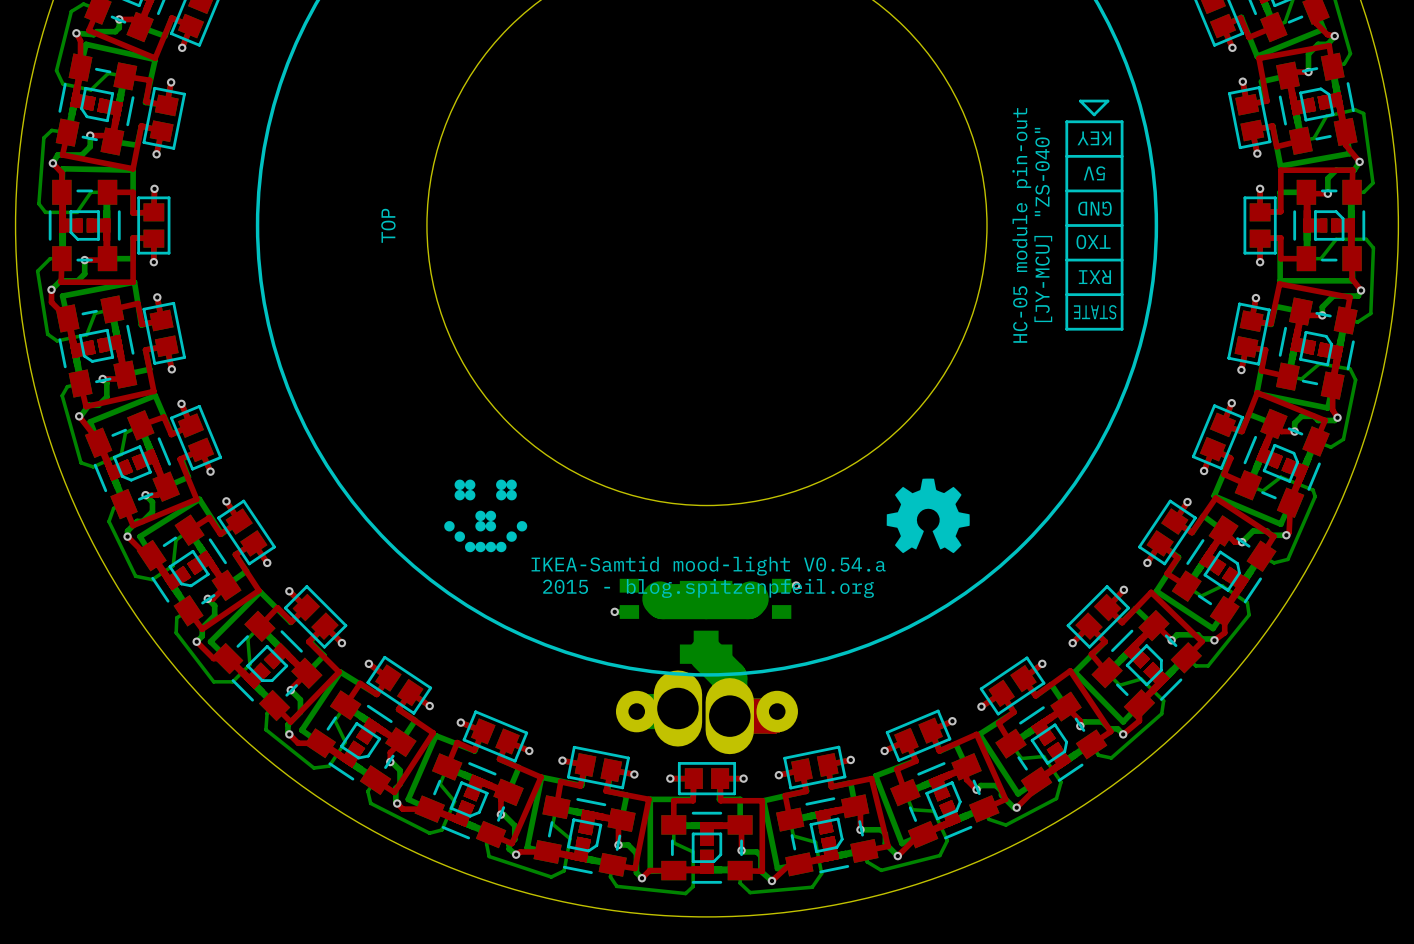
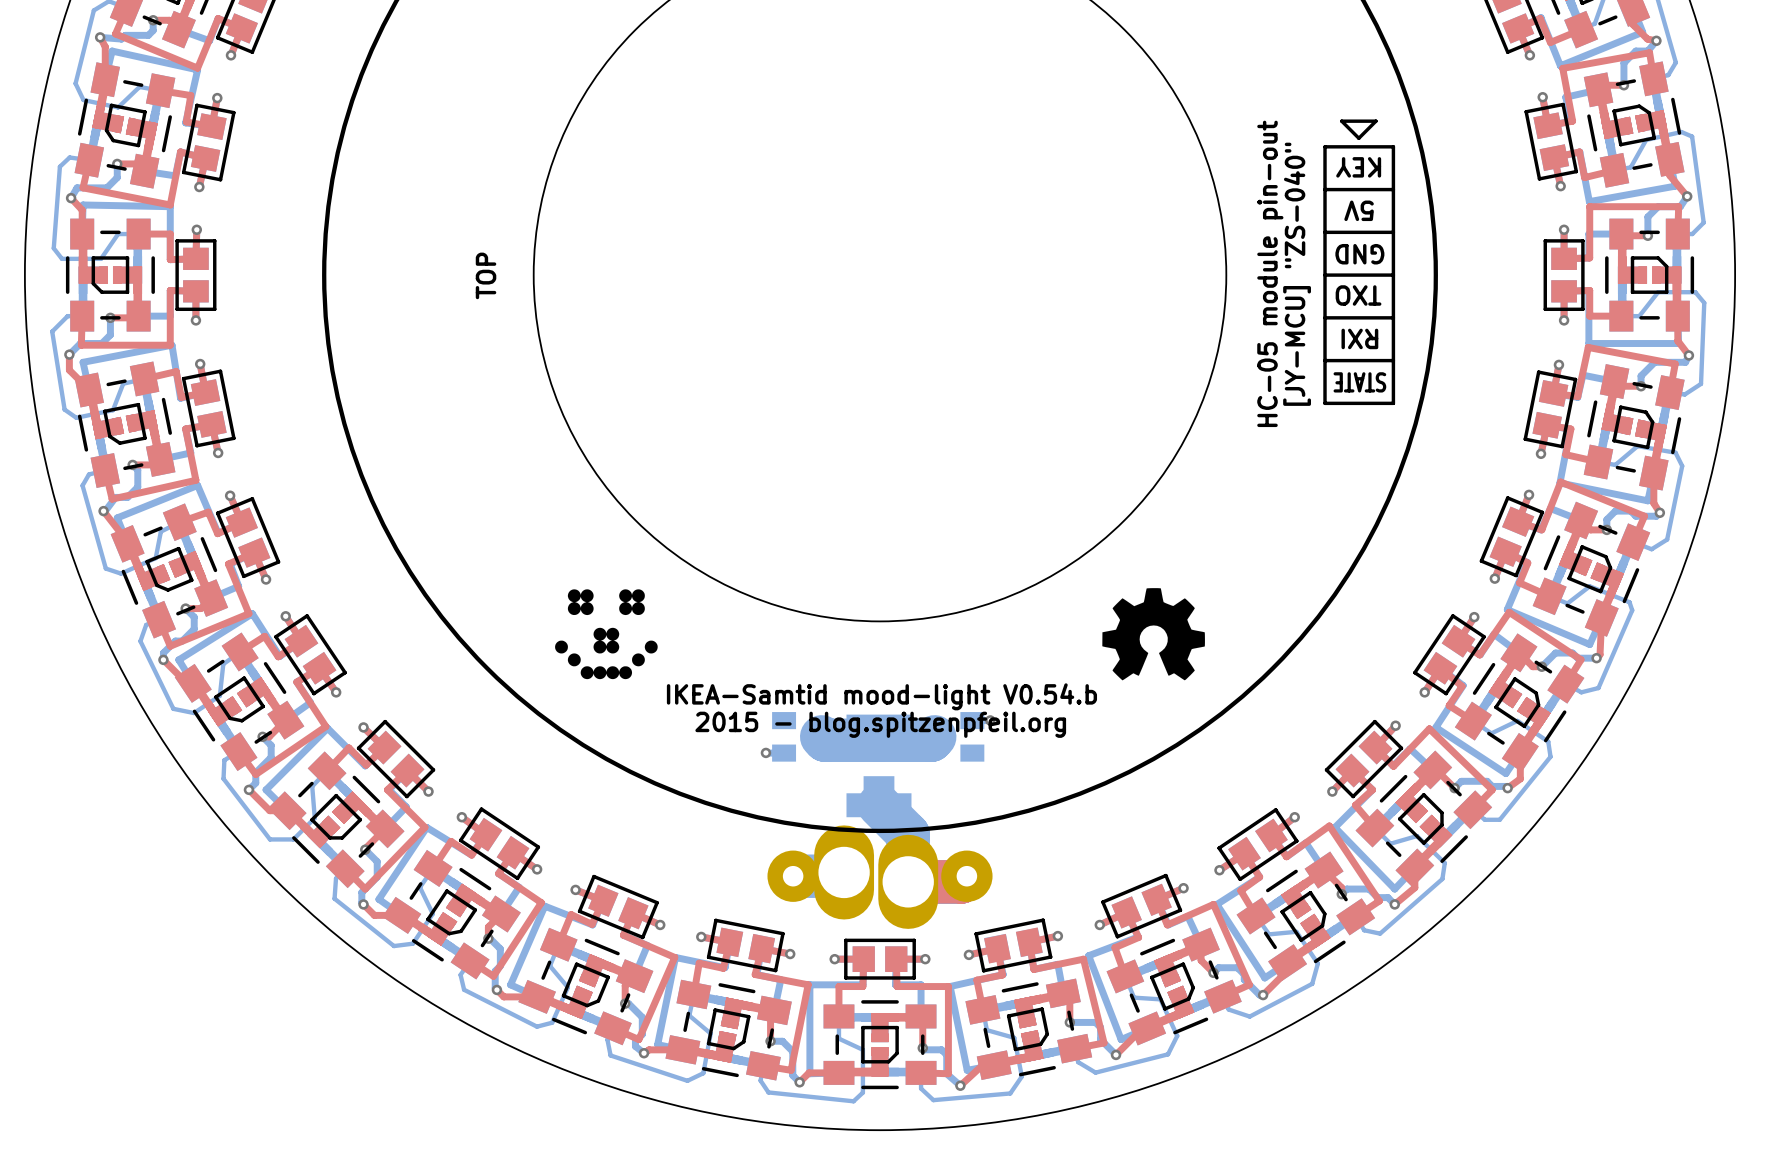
text: IKEA-Samtid mood-light V0.54.a (708, 566) -> IKEA-Samtid mood-light V0.54.b (881, 696)

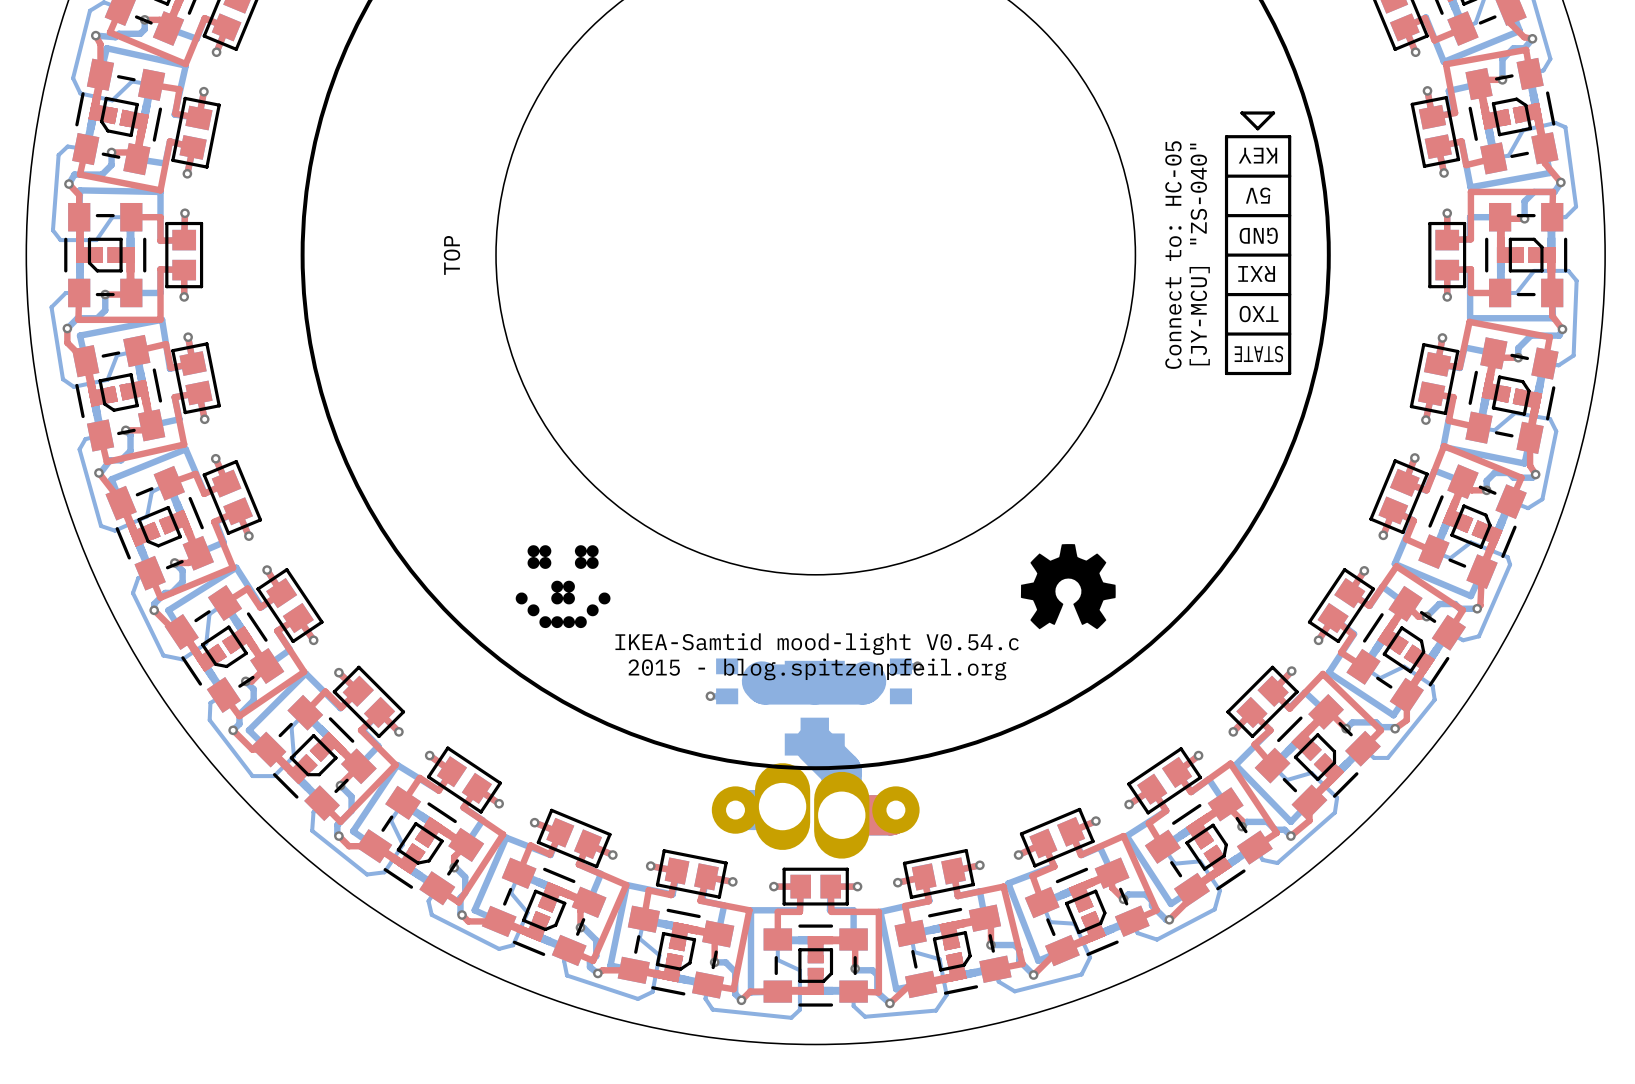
text: HC-05 module pin-out (1270, 273) -> Connect to: HC-05 (1173, 255)
text: TXO (1358, 295) -> RXI (1256, 273)
text: RXI (1359, 338) -> TXO (1259, 314)
text: IKEA-Samtid mood-light V0.54.b (881, 696) -> IKEA-Samtid mood-light V0.54.c (817, 644)

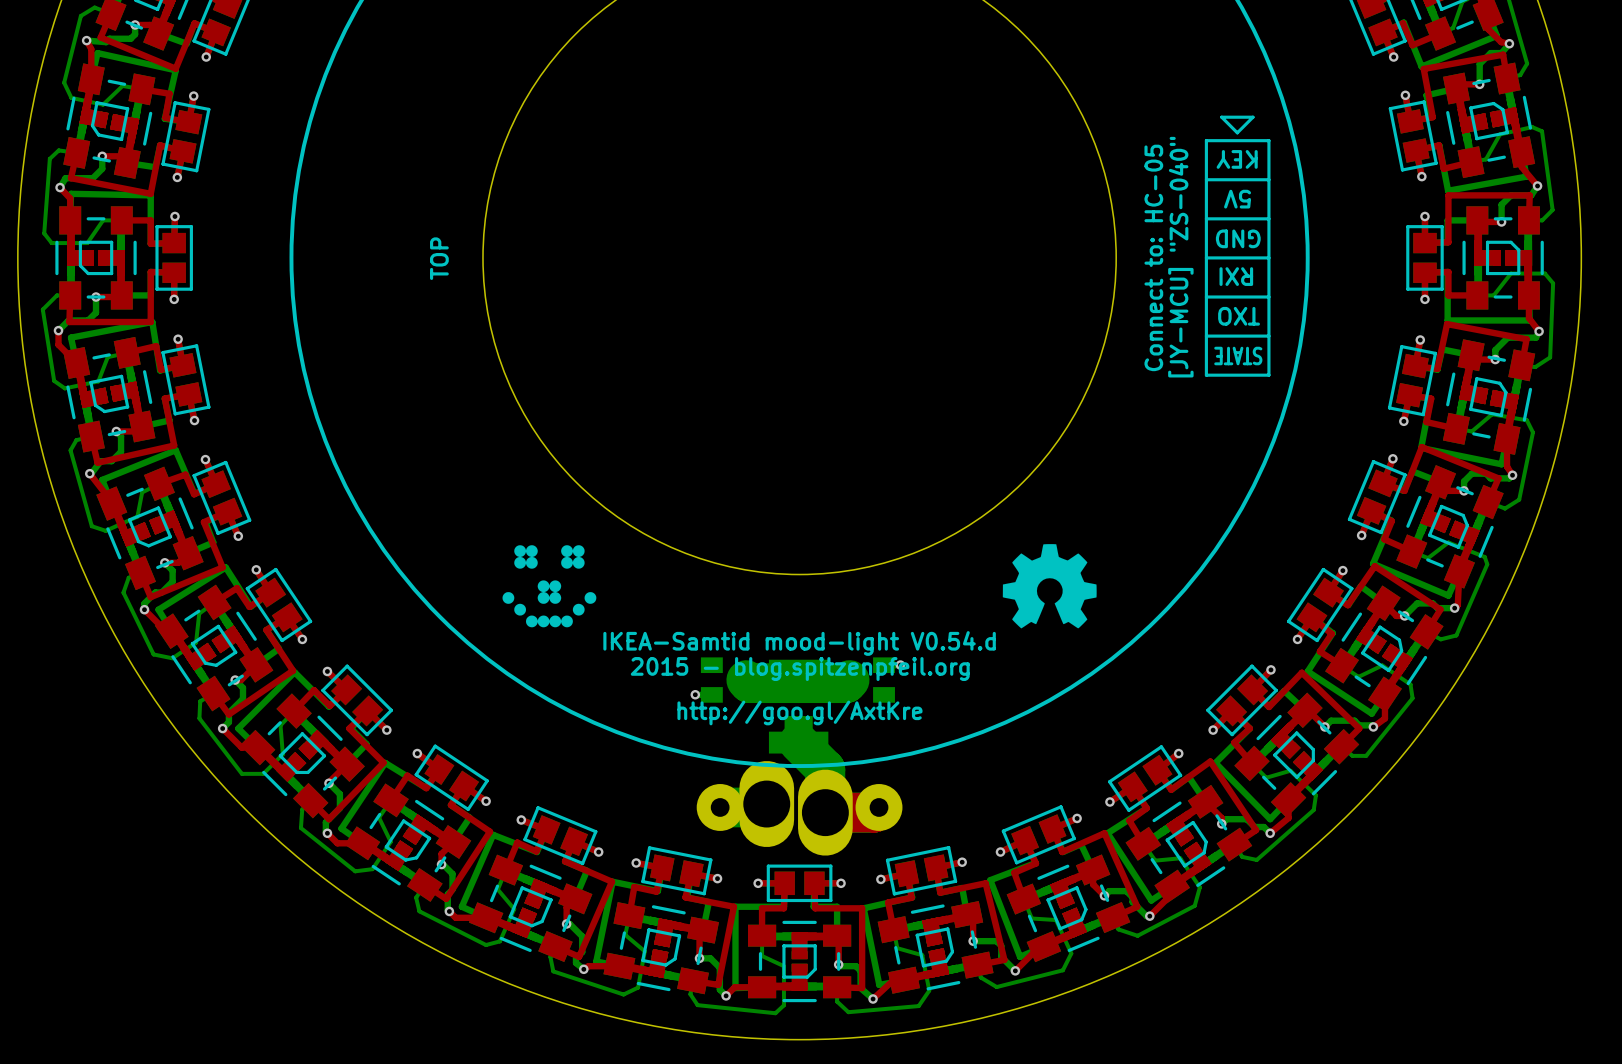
text: IKEA-Samtid mood-light V0.54.c (817, 644) -> IKEA-Samtid mood-light V0.54.d (799, 643)
text: none -> http://goo.gl/AxtKre (799, 712)

